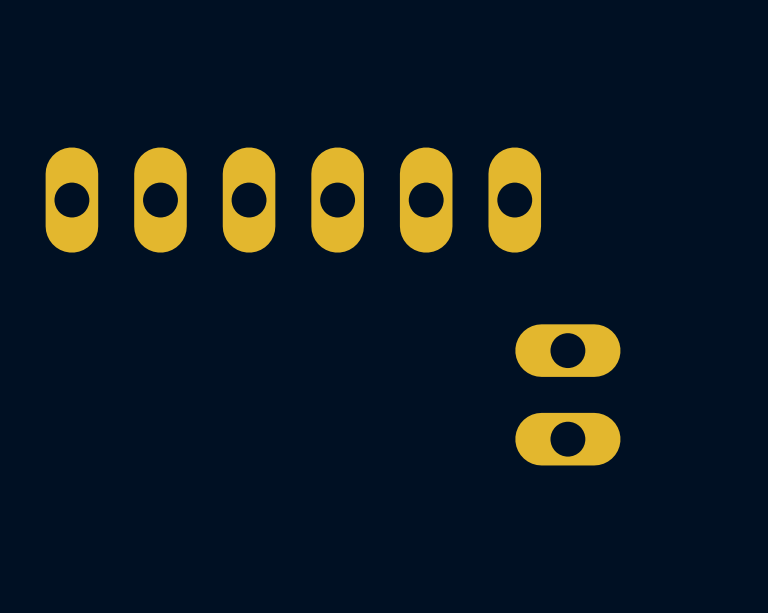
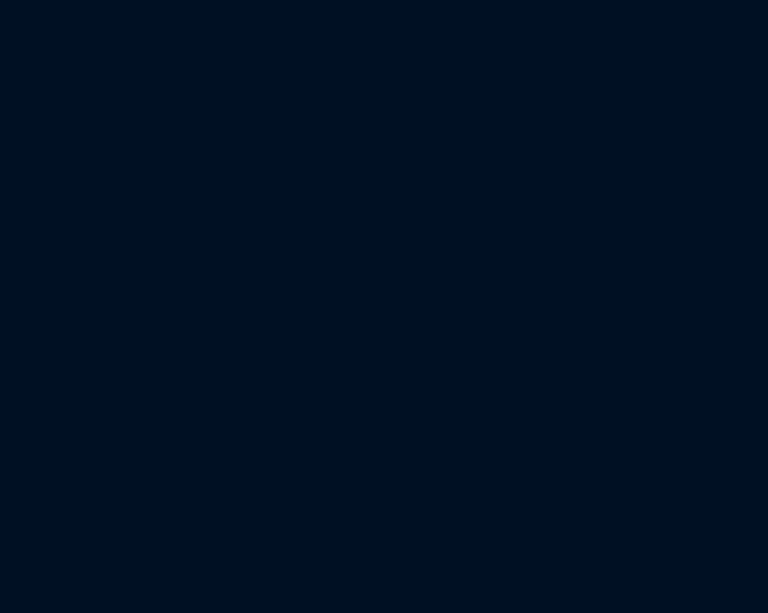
part: (293, 200) -> none
part: (567, 394) -> none

